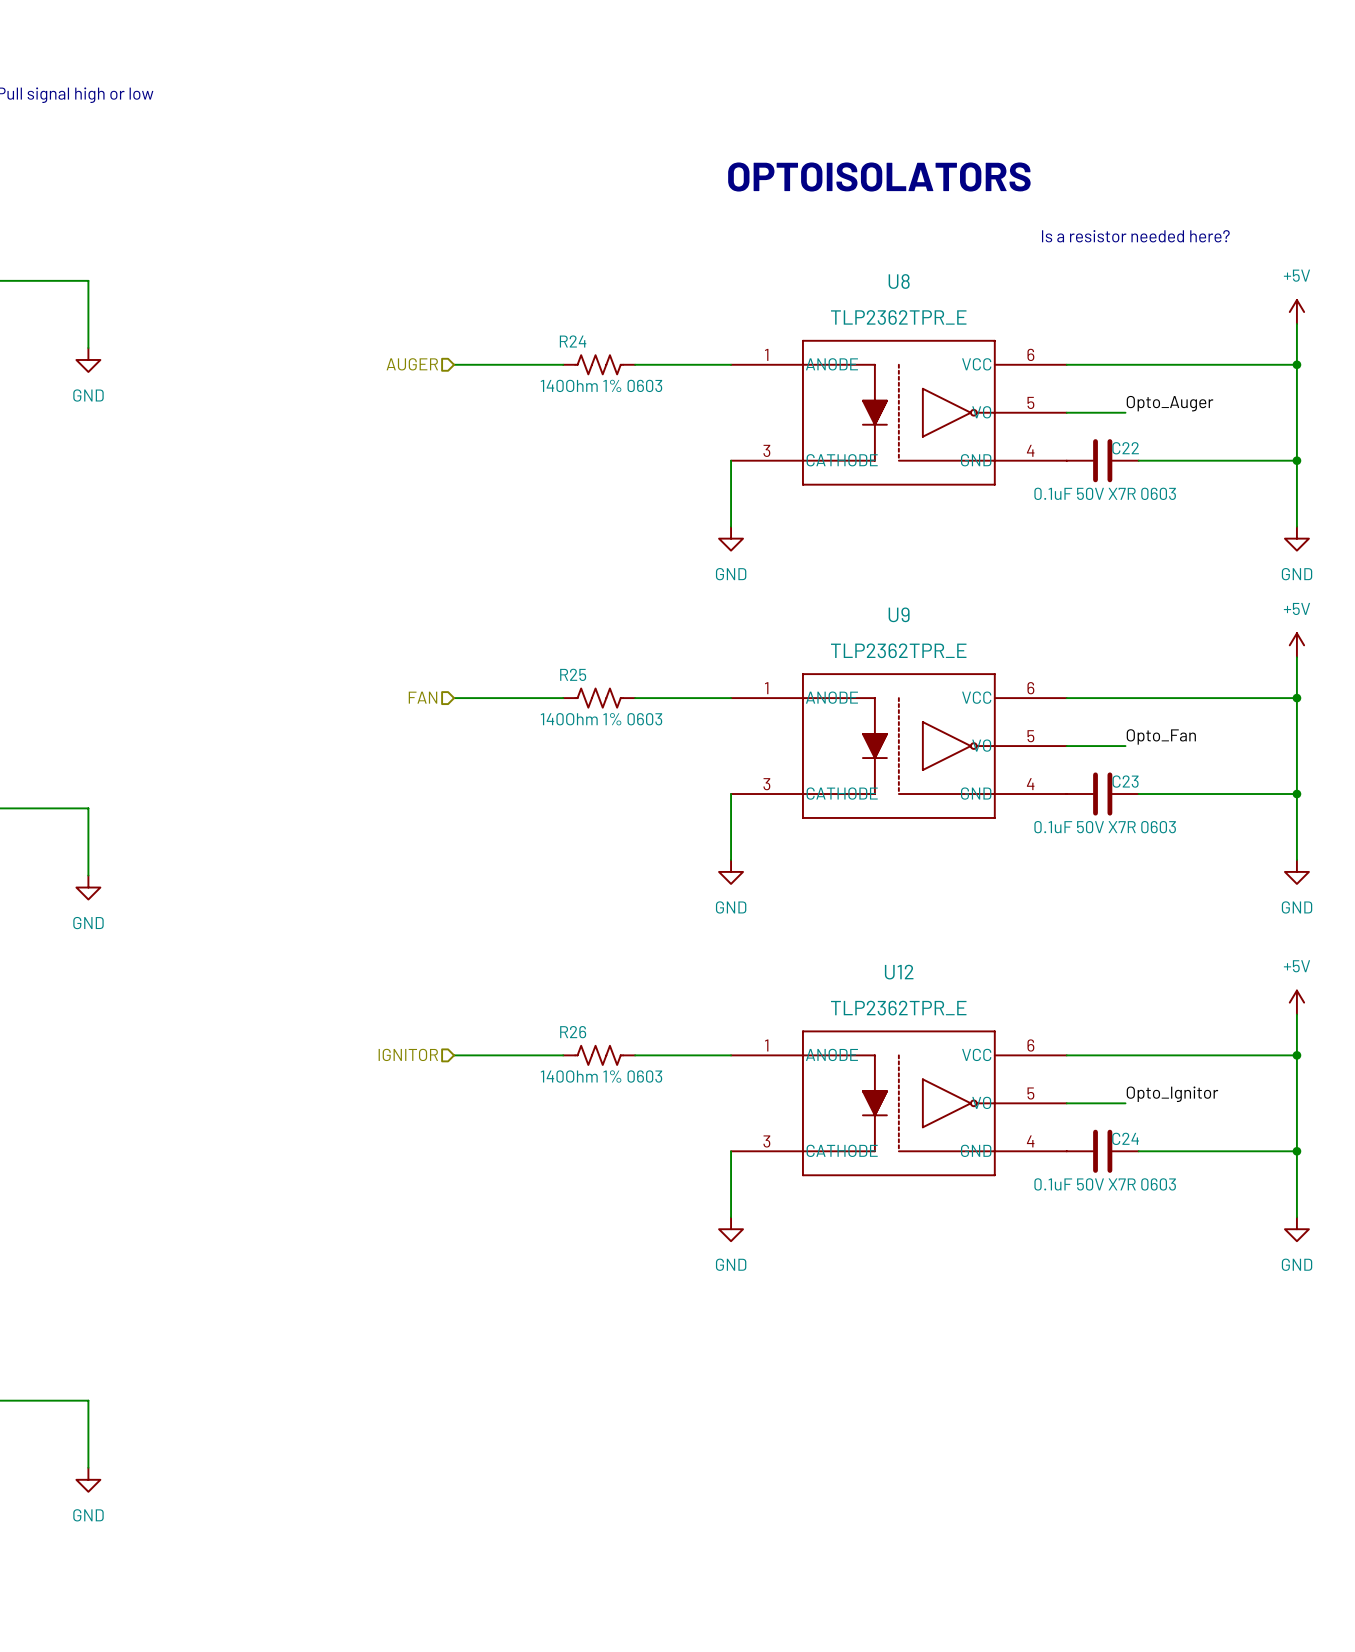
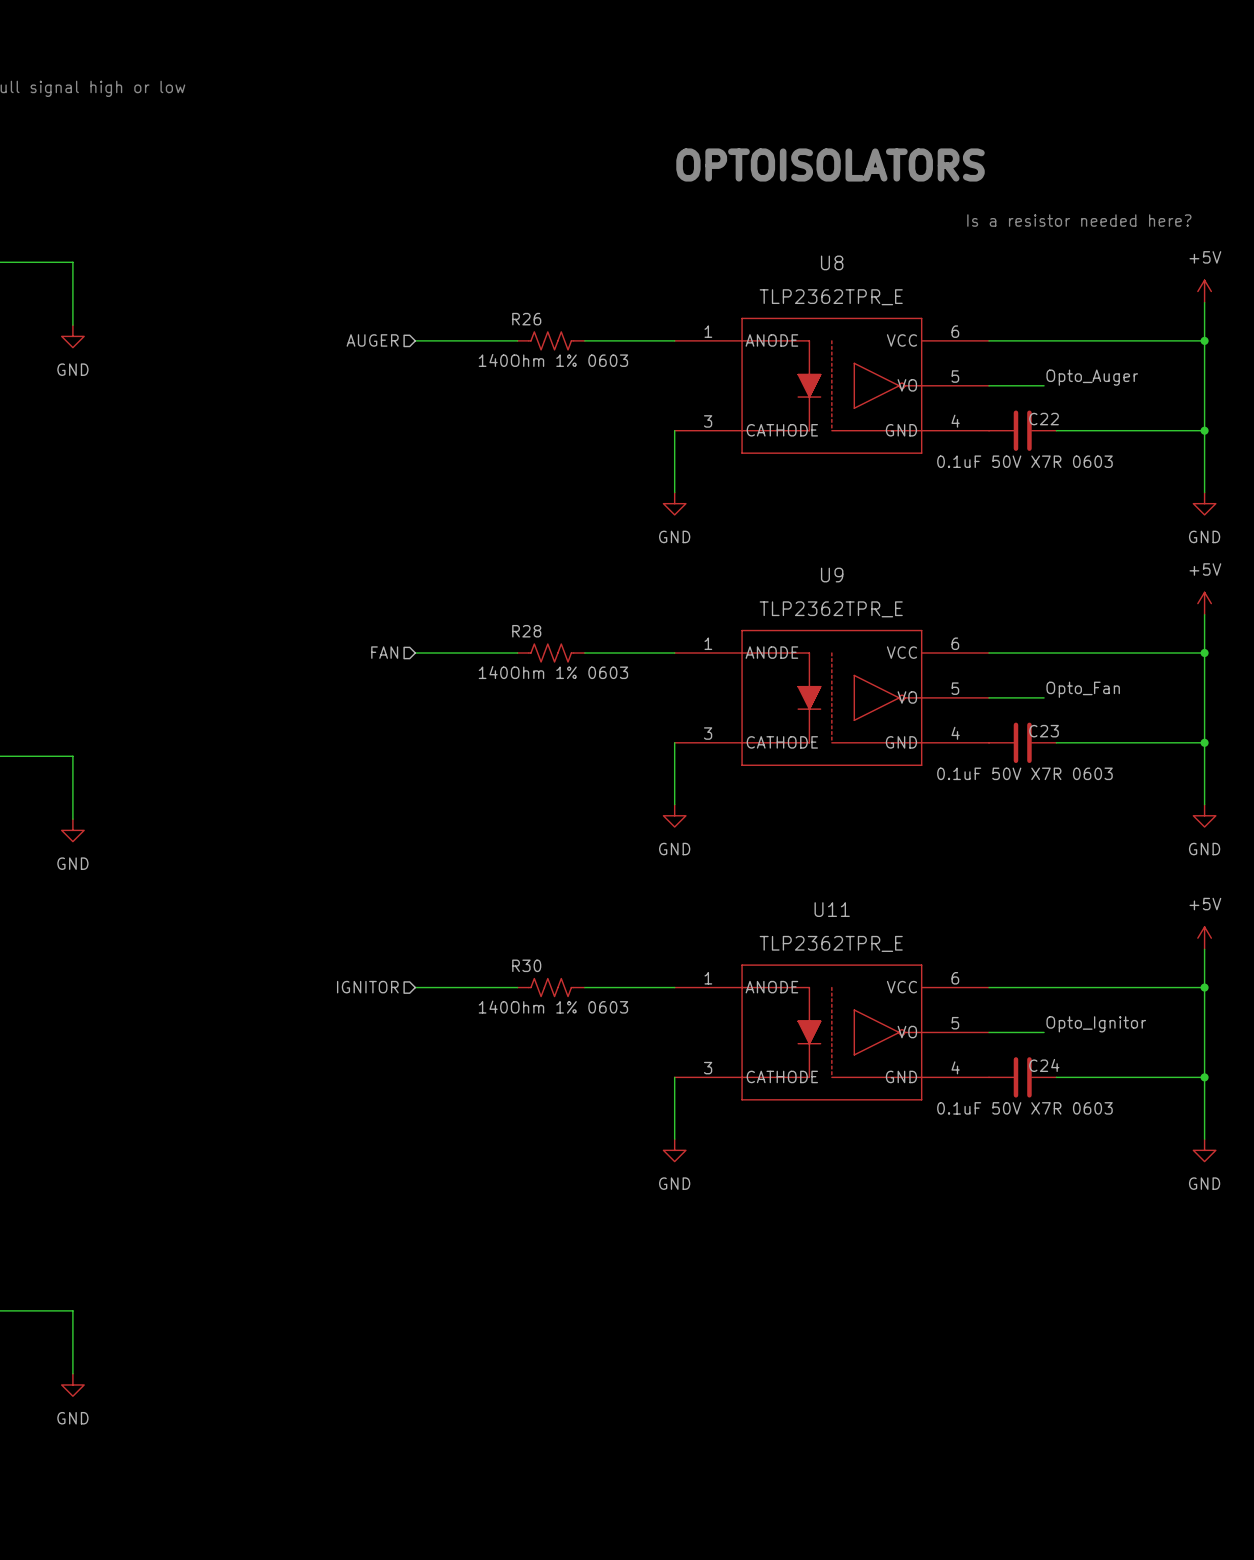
R24 name: R24 (573, 341) -> R26 (526, 319)
R25 name: R25 (573, 674) -> R28 (526, 631)
U12 name: U12 (899, 972) -> U11 (832, 909)
R26 name: R26 (573, 1032) -> R30 (526, 965)

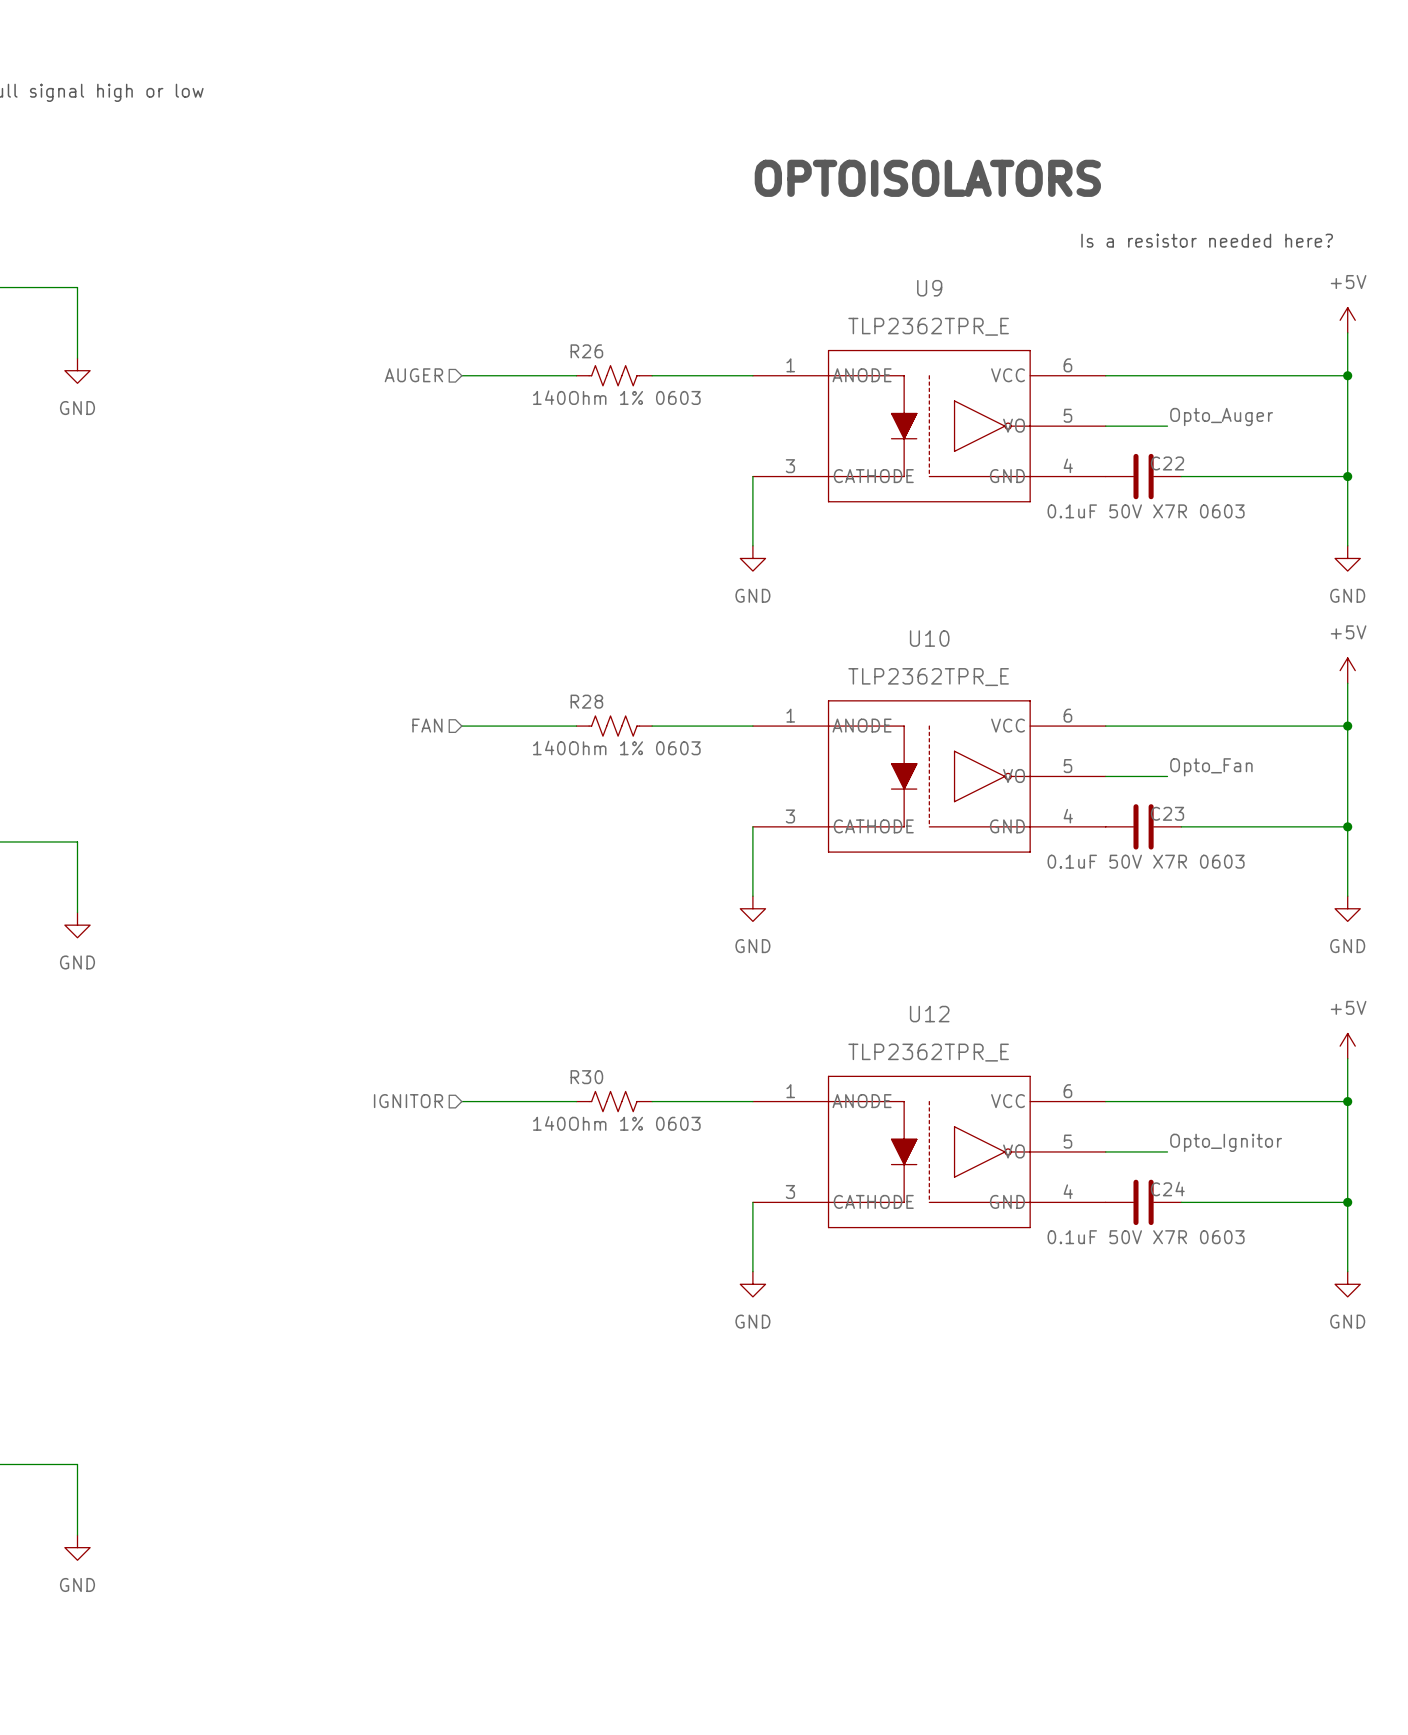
U8 name: U8 (832, 262) -> U9 (929, 288)
U9 name: U9 (832, 575) -> U10 (929, 638)
U11 name: U11 (832, 909) -> U12 (929, 1014)

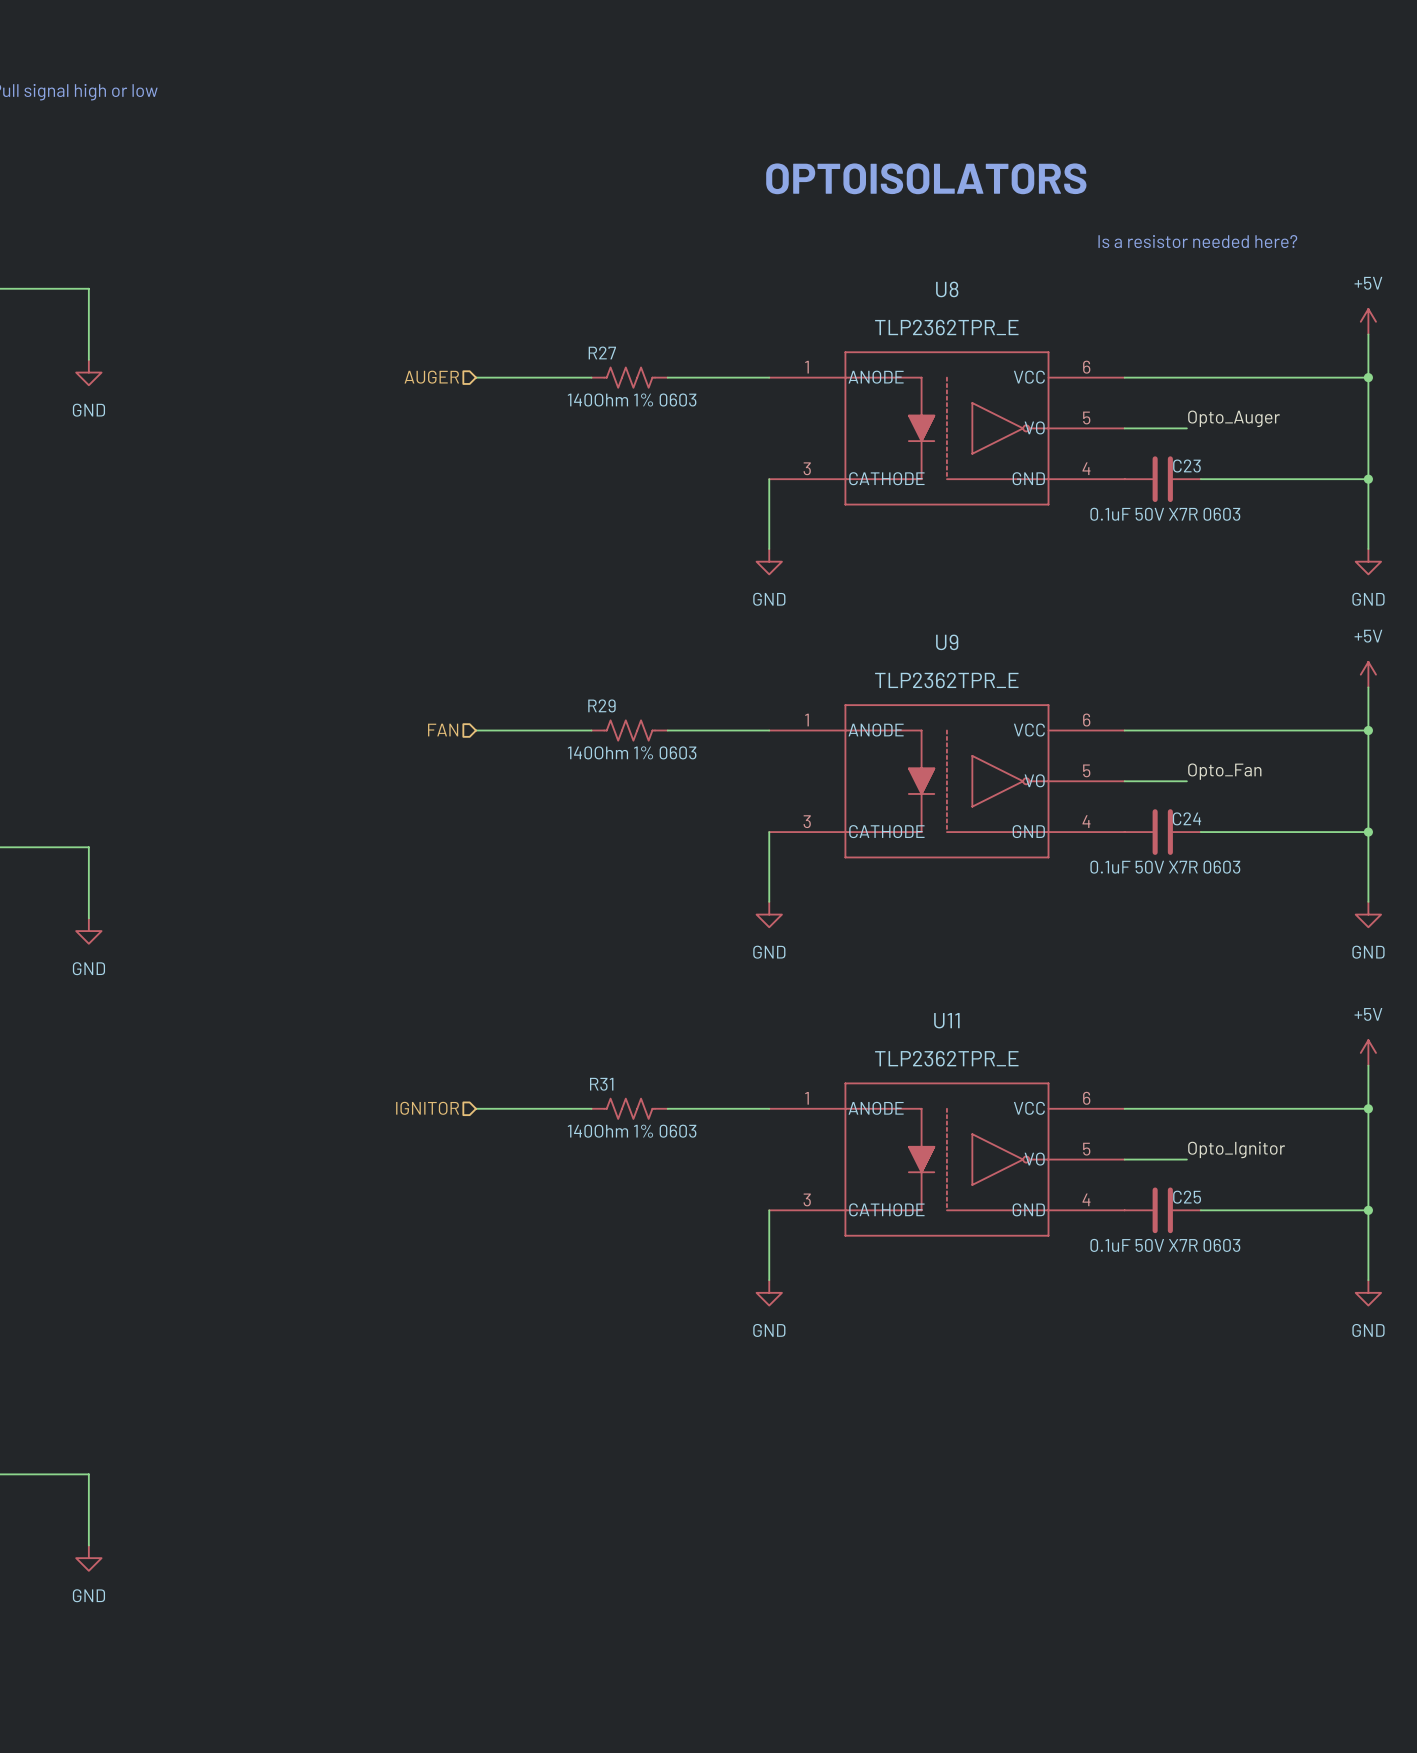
U9 name: U9 (929, 288) -> U8 (947, 289)
R26 name: R26 (586, 351) -> R27 (602, 352)
C22 name: C22 (1167, 463) -> C23 (1186, 466)
U10 name: U10 (929, 638) -> U9 (947, 642)
R28 name: R28 (586, 701) -> R29 (601, 705)
C23 name: C23 (1167, 813) -> C24 (1186, 818)
U12 name: U12 (929, 1014) -> U11 (946, 1020)
R30 name: R30 (586, 1077) -> R31 (601, 1084)
C24 name: C24 (1167, 1189) -> C25 (1187, 1197)

